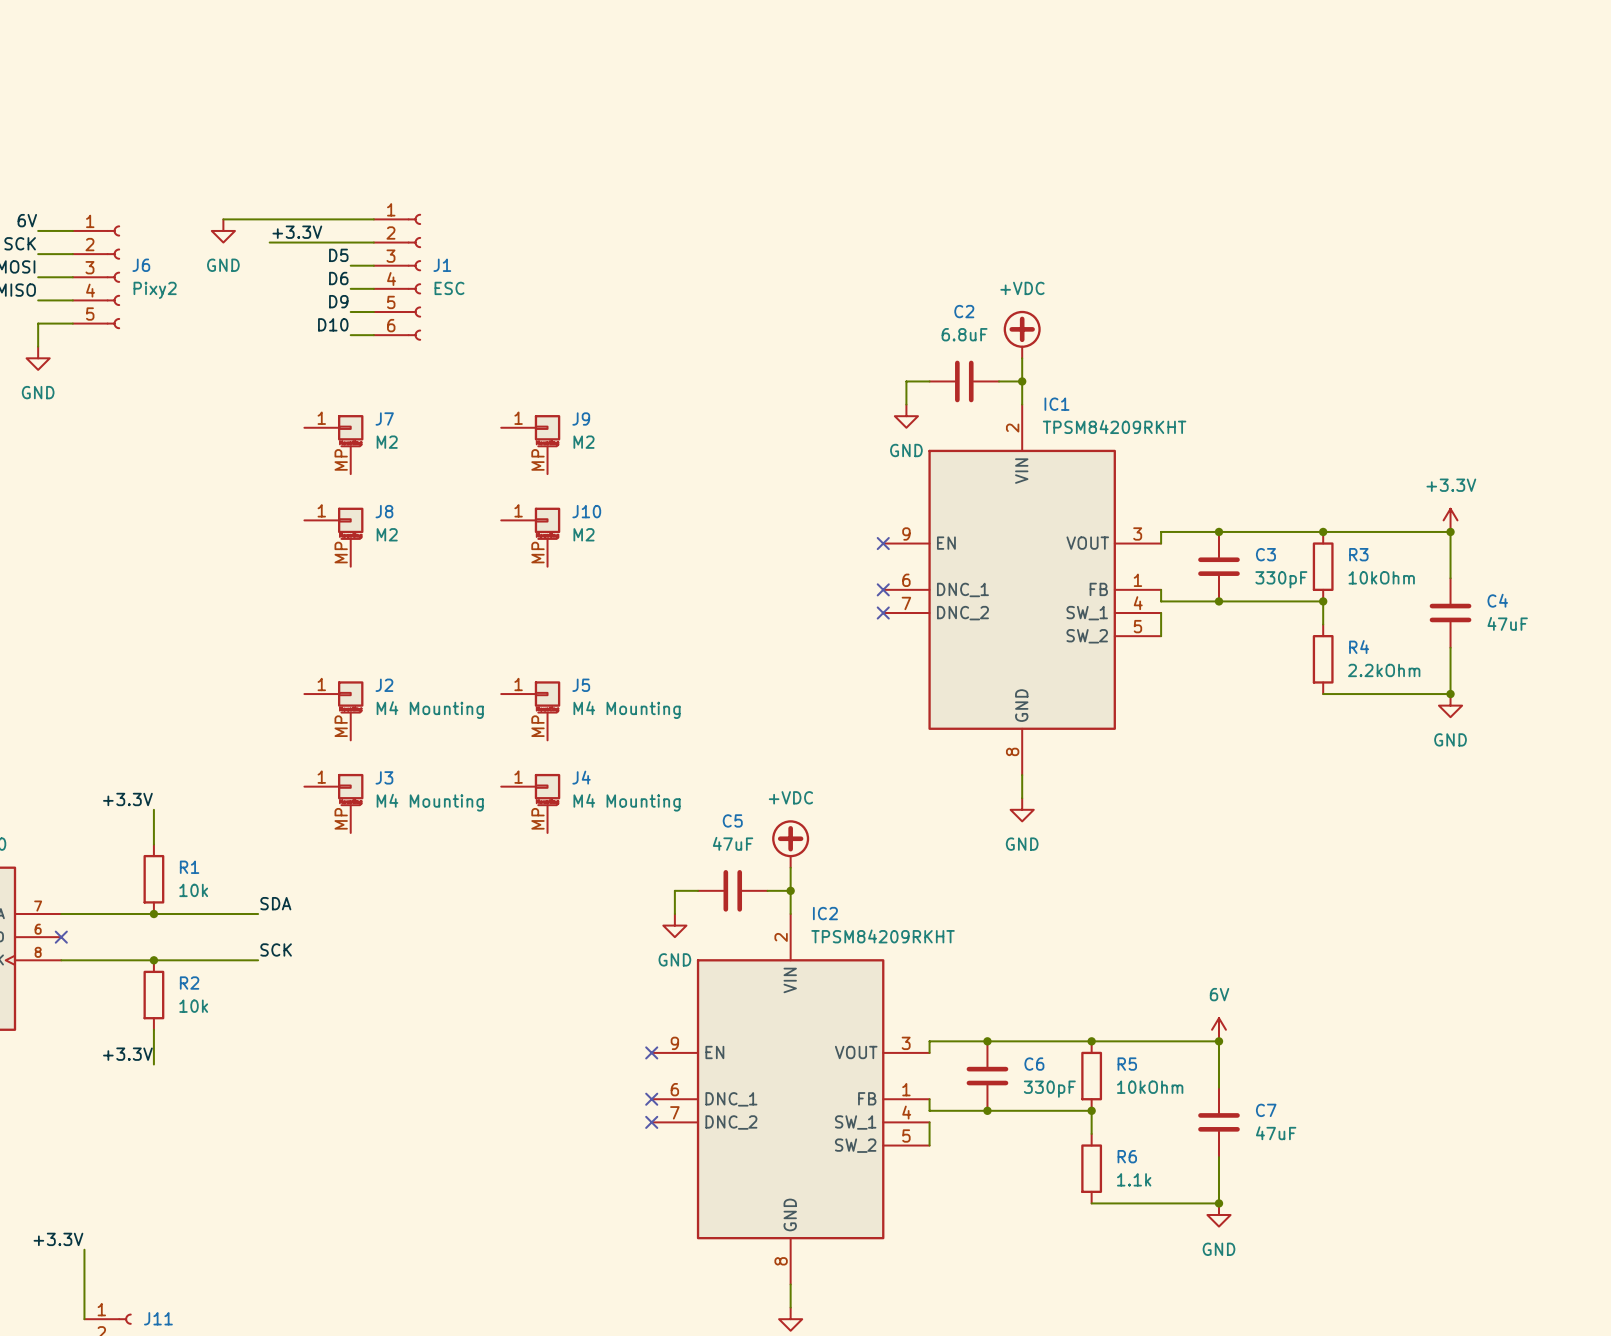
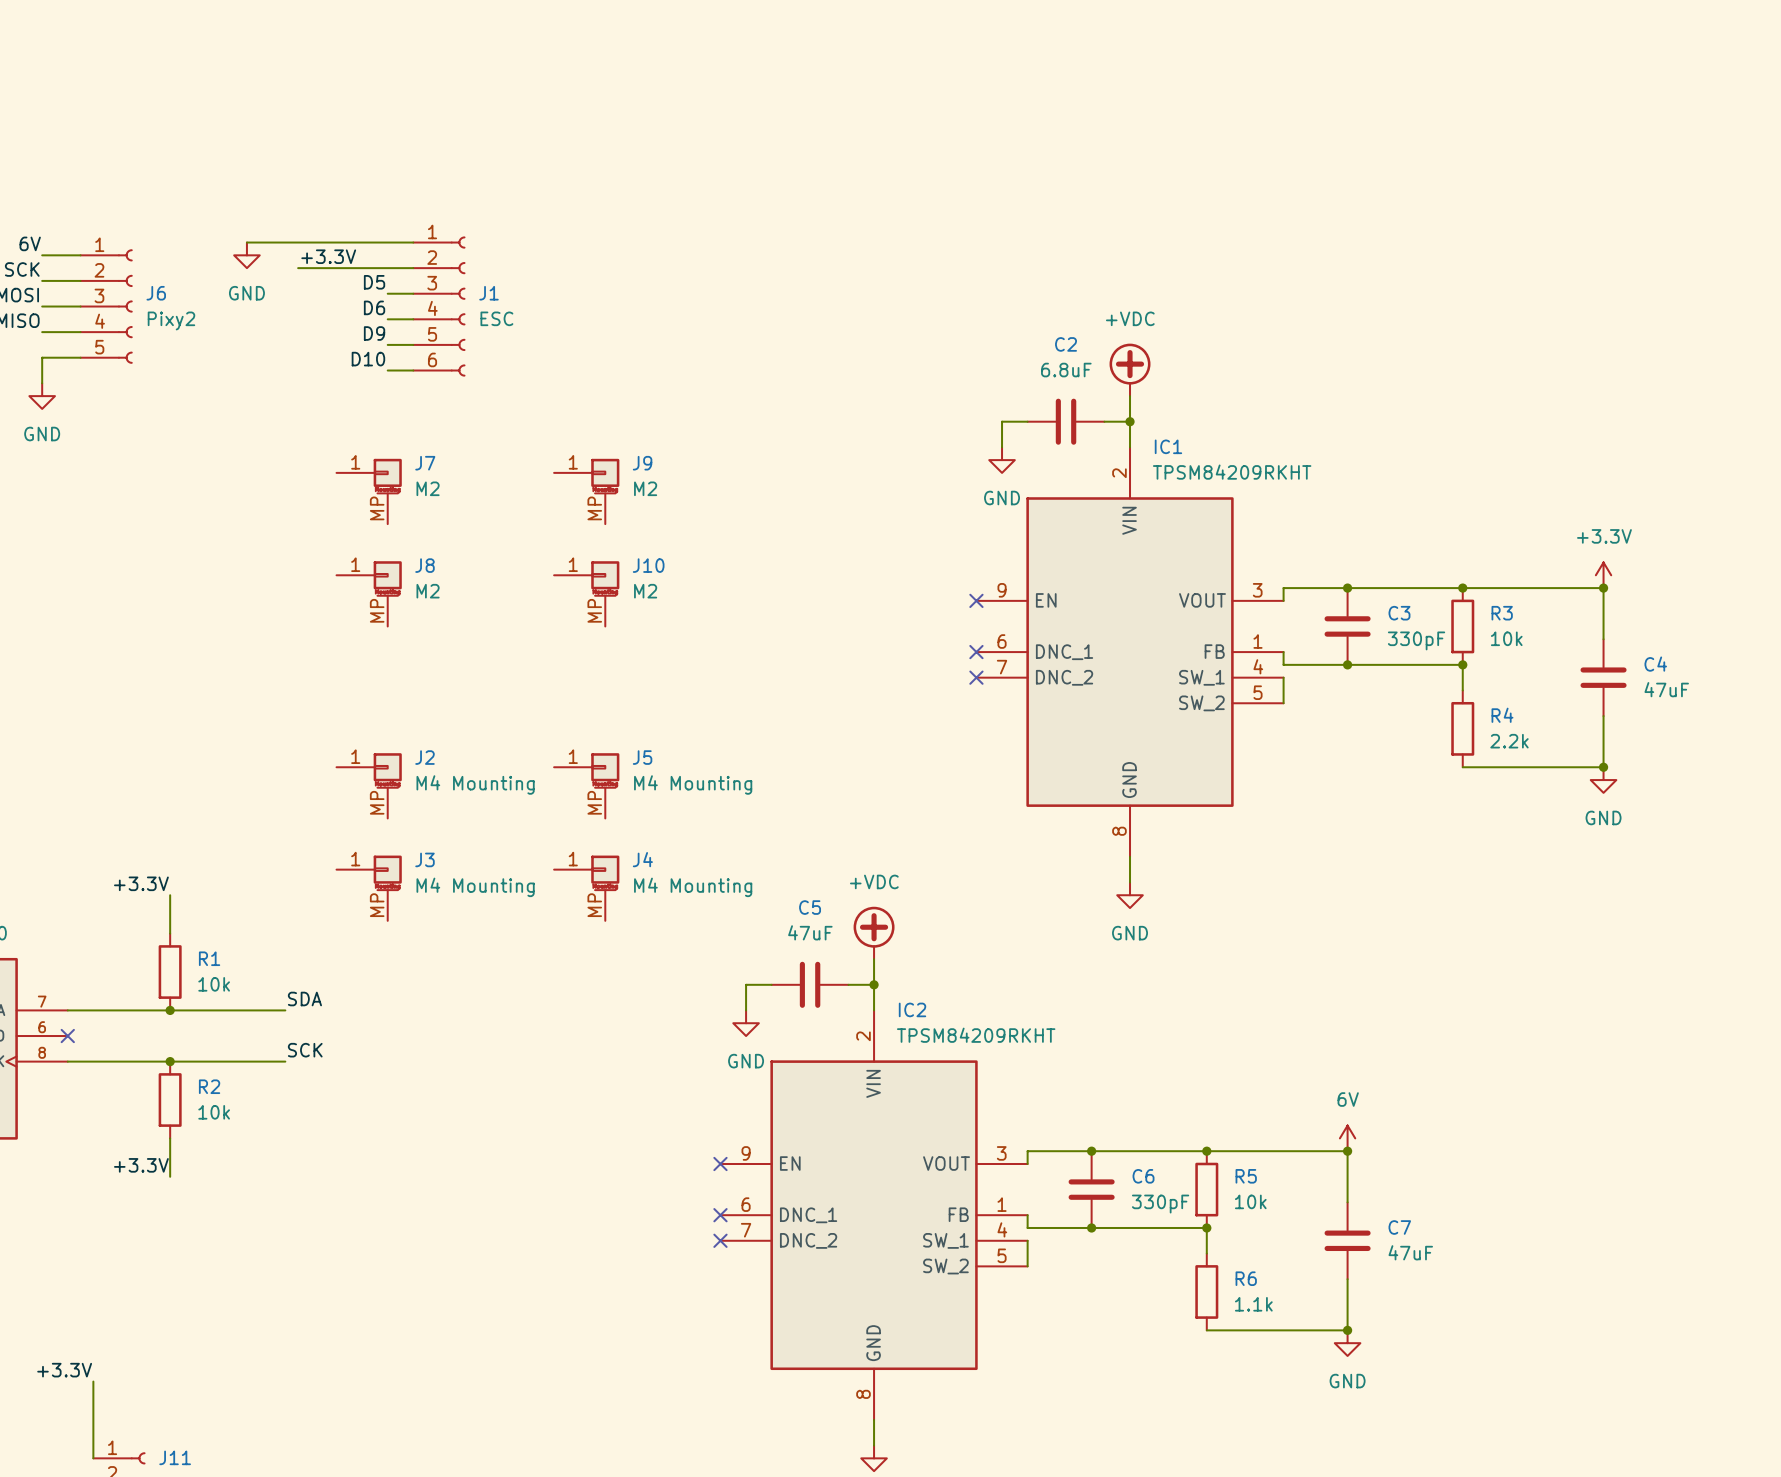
R3 value: 10kOhm (1381, 577) -> 10k (1506, 638)
R4 value: 2.2kOhm (1384, 670) -> 2.2k (1509, 741)
R5 value: 10kOhm (1150, 1087) -> 10k (1250, 1201)

